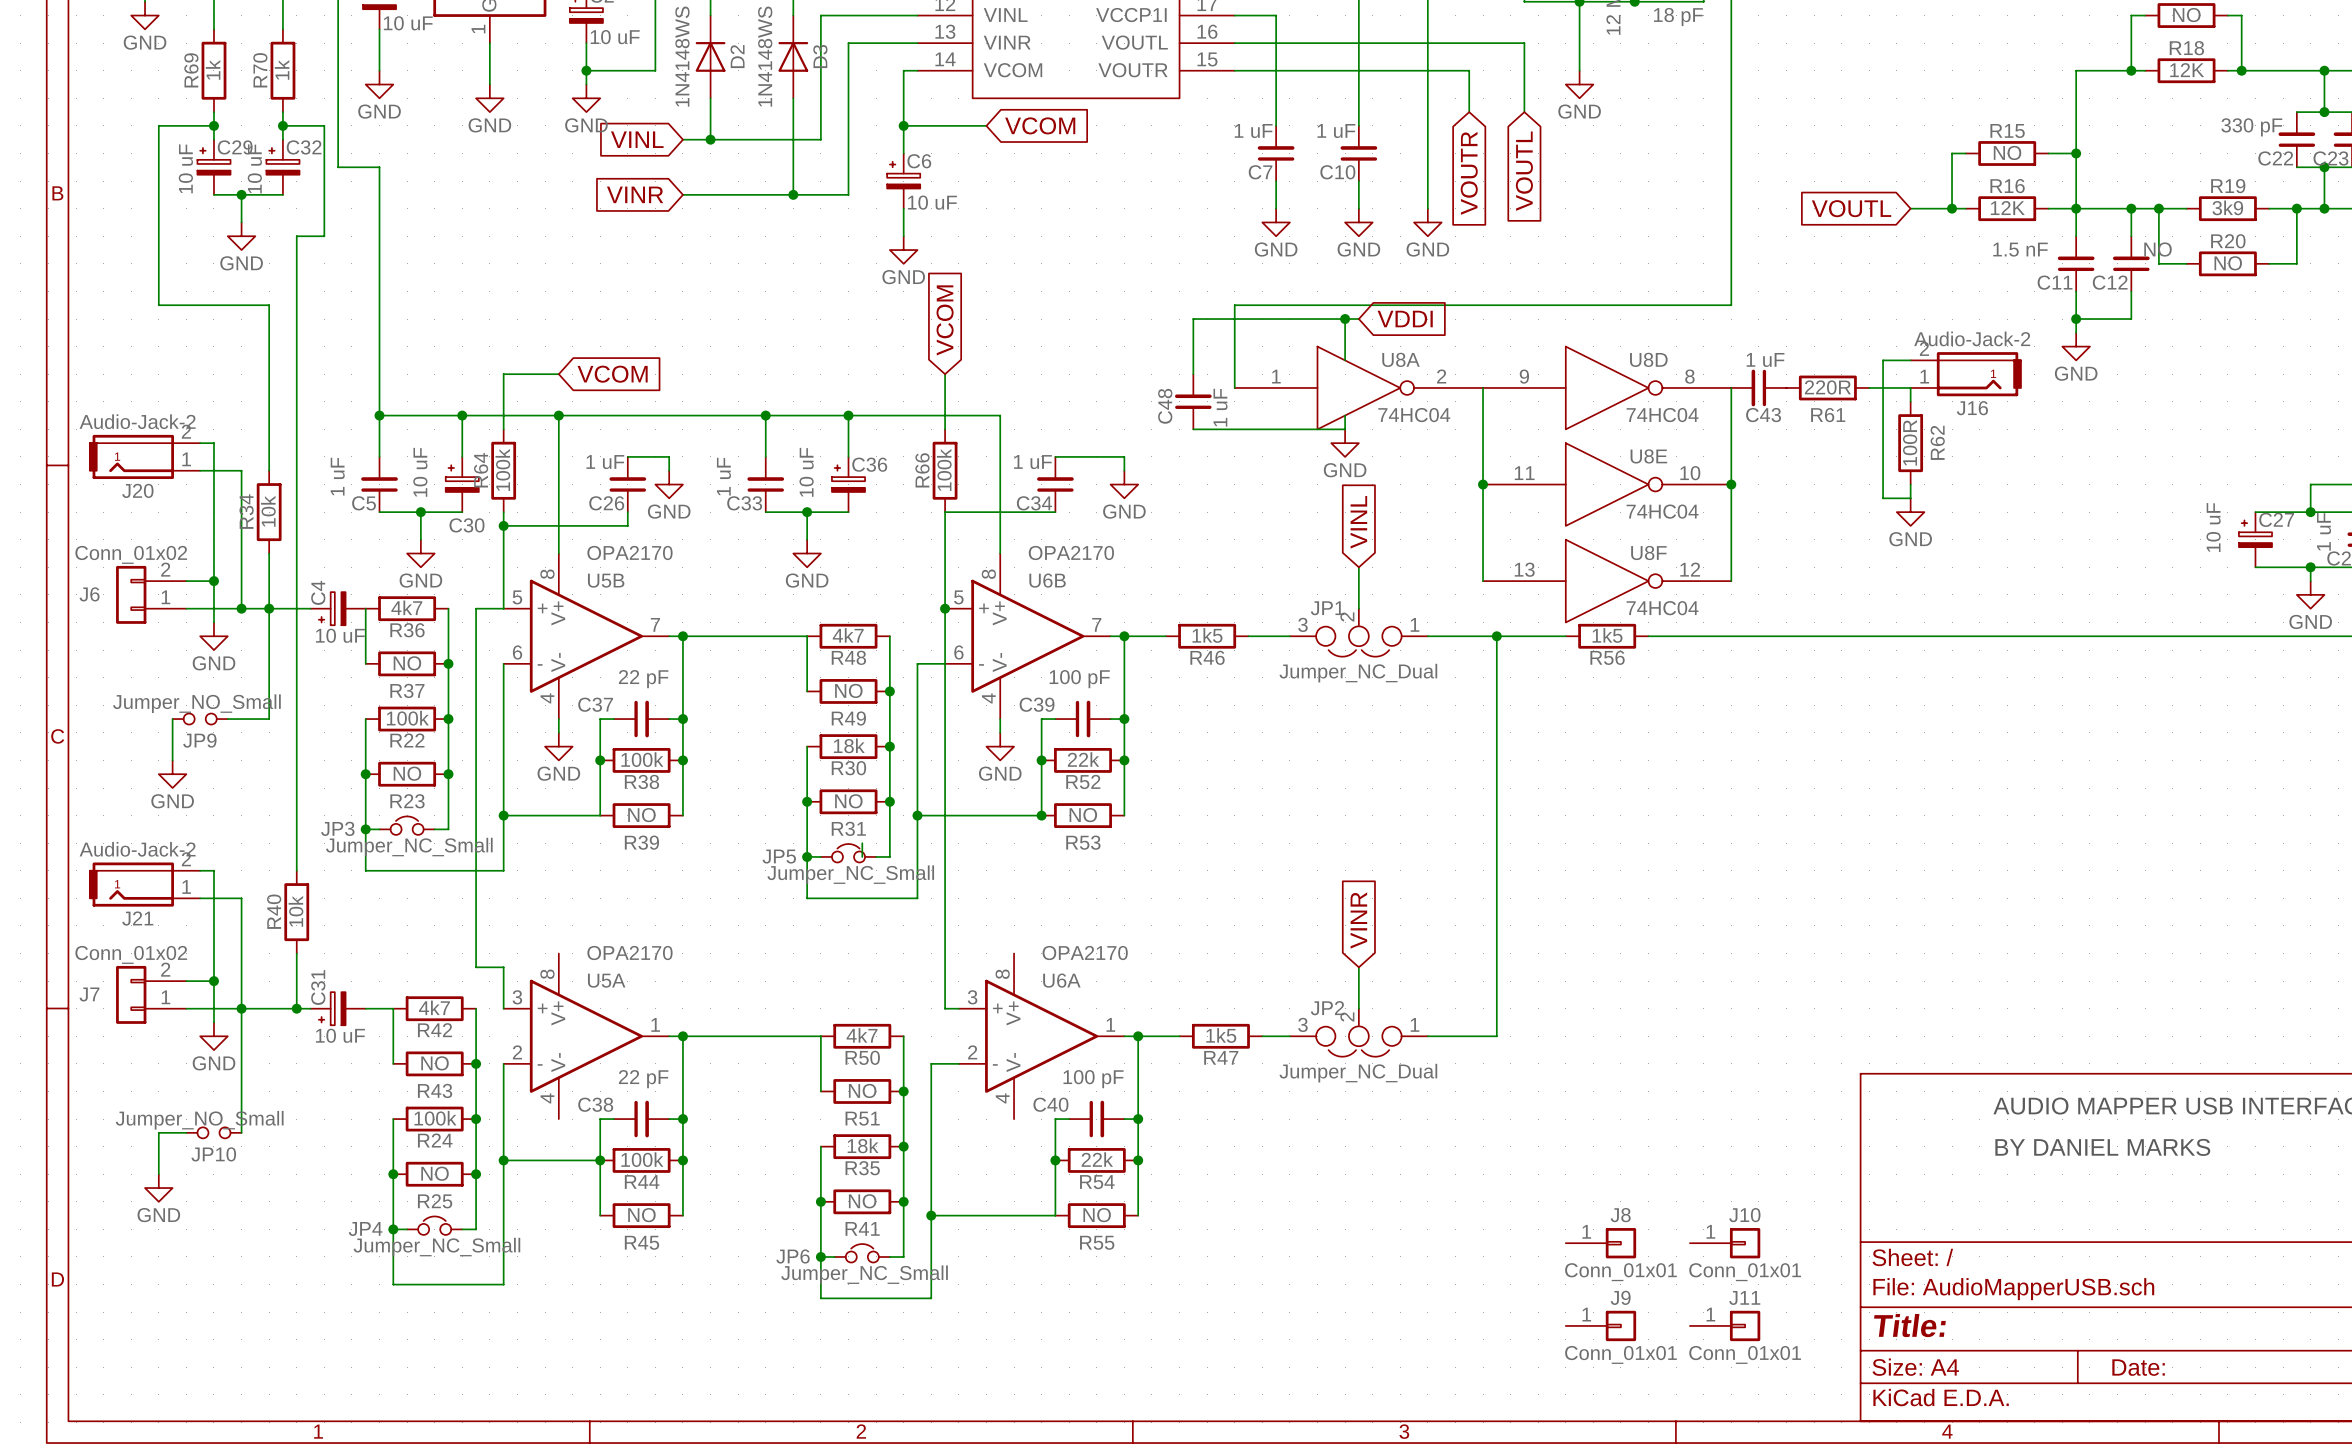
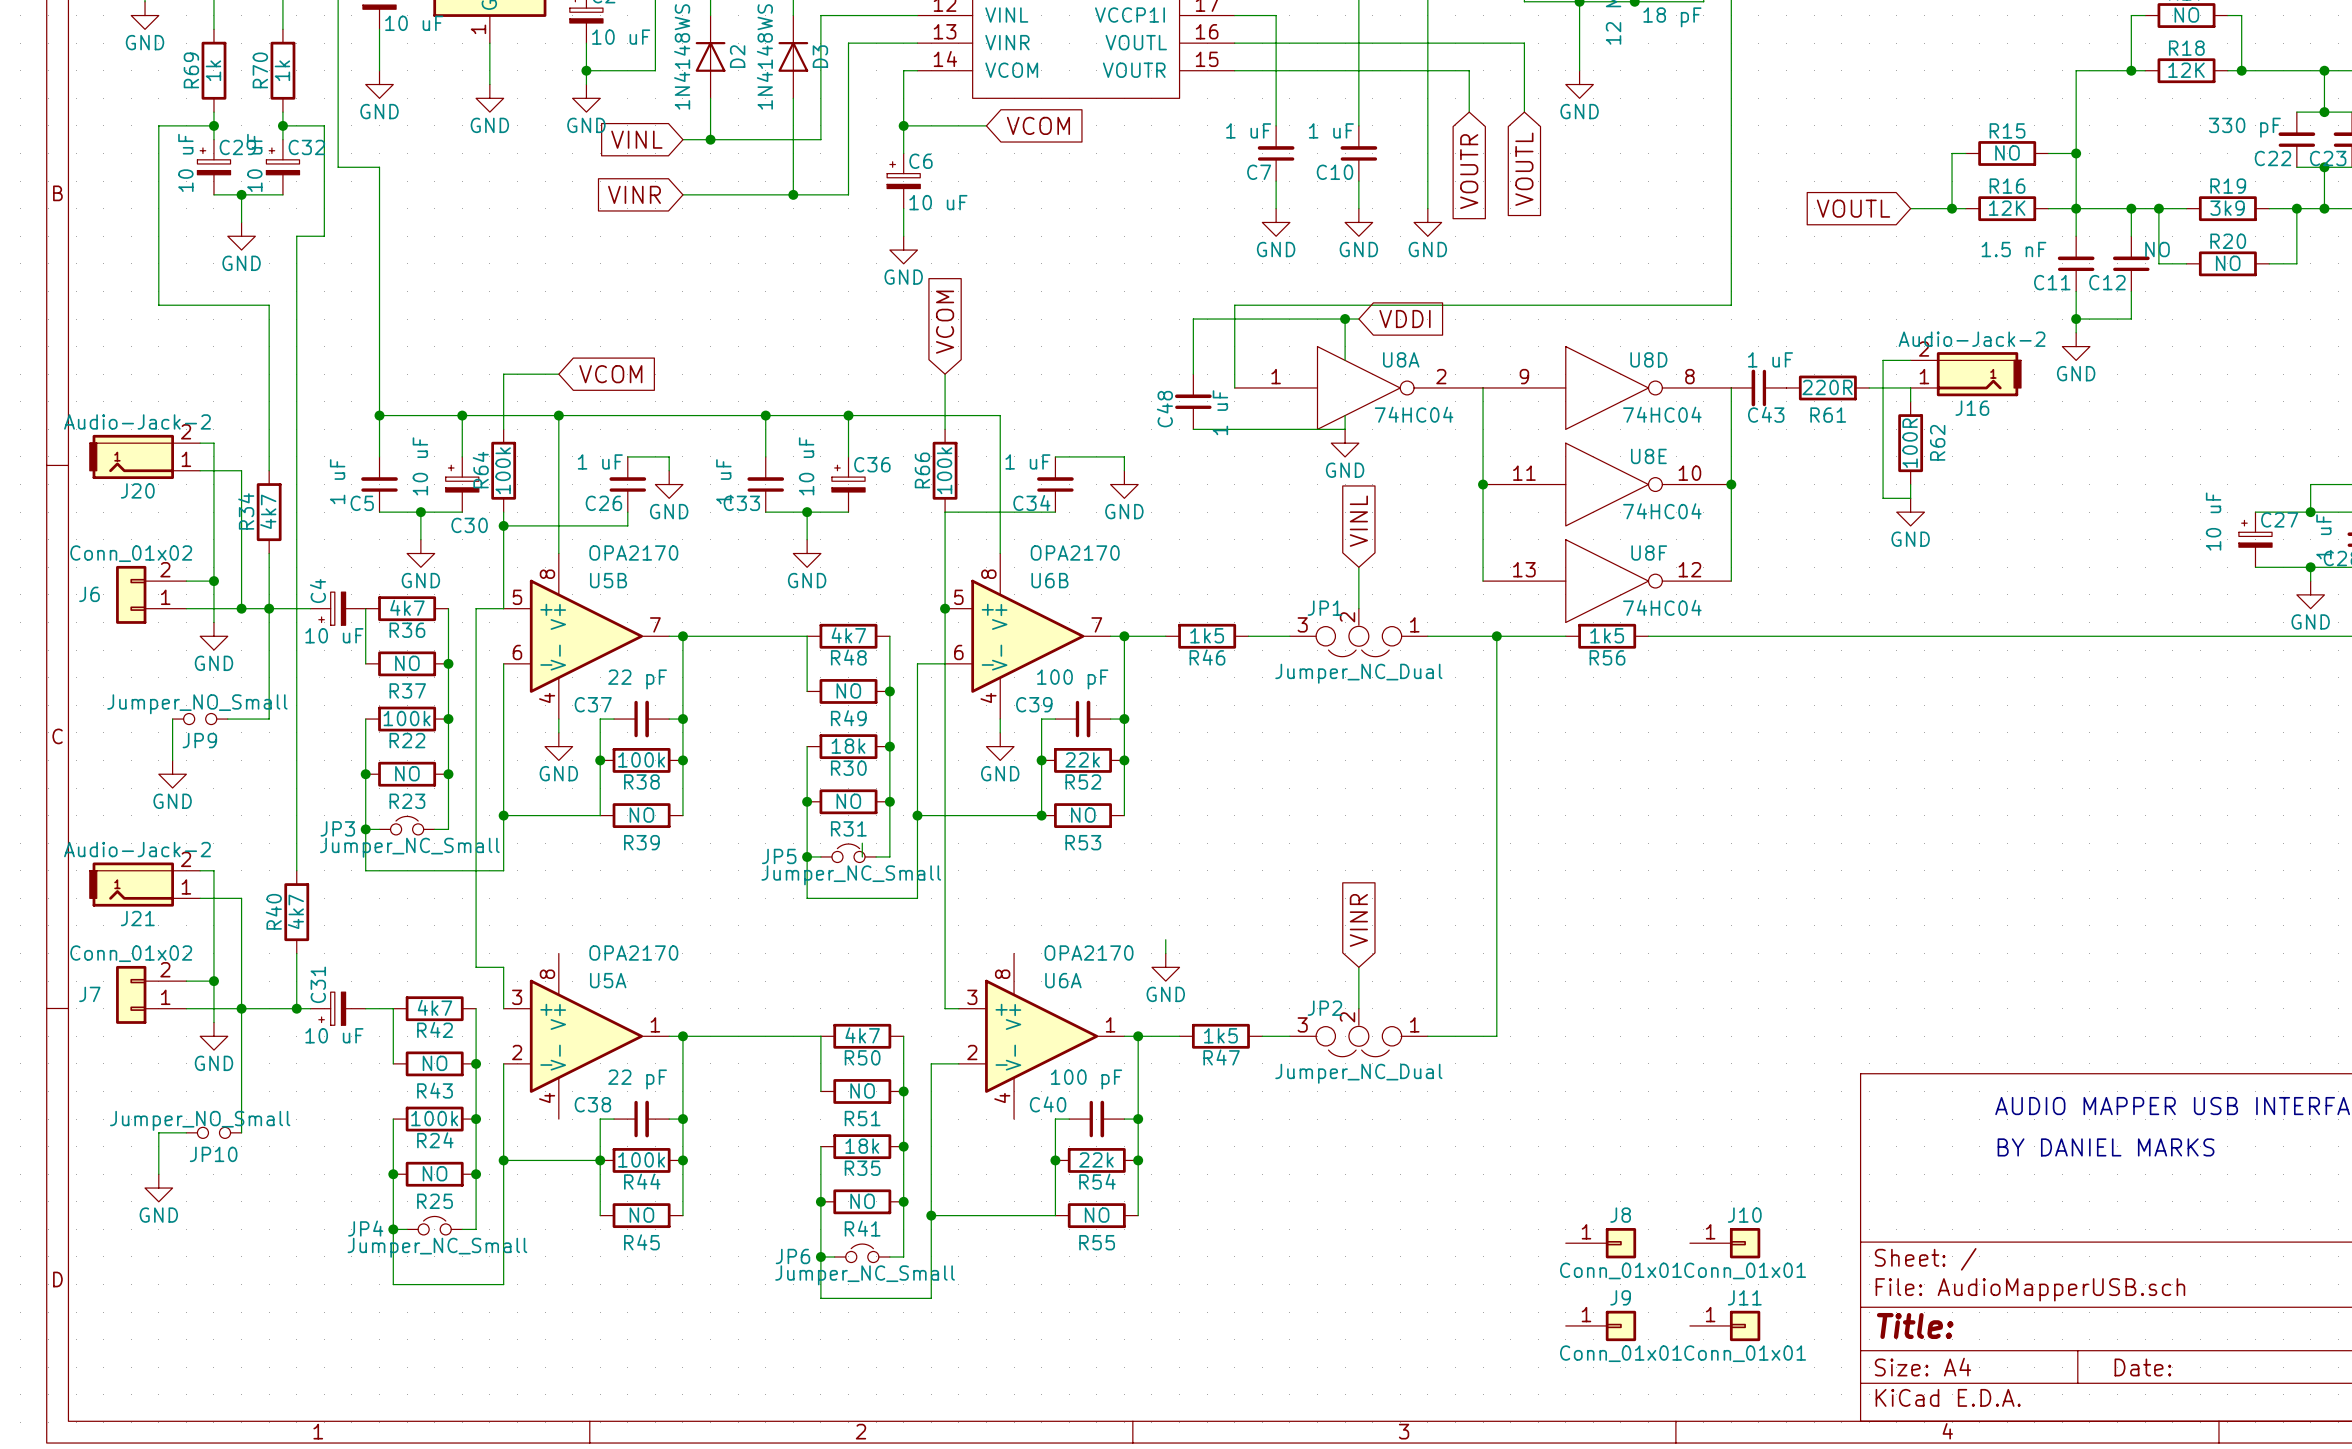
R34 value: 10k (268, 511) -> 4k7 (268, 511)
R40 value: 10k (295, 911) -> 4k7 (295, 911)
wire: none -> (1165, 939) (1165, 953)
power symbol: none -> GND (1165, 967)

